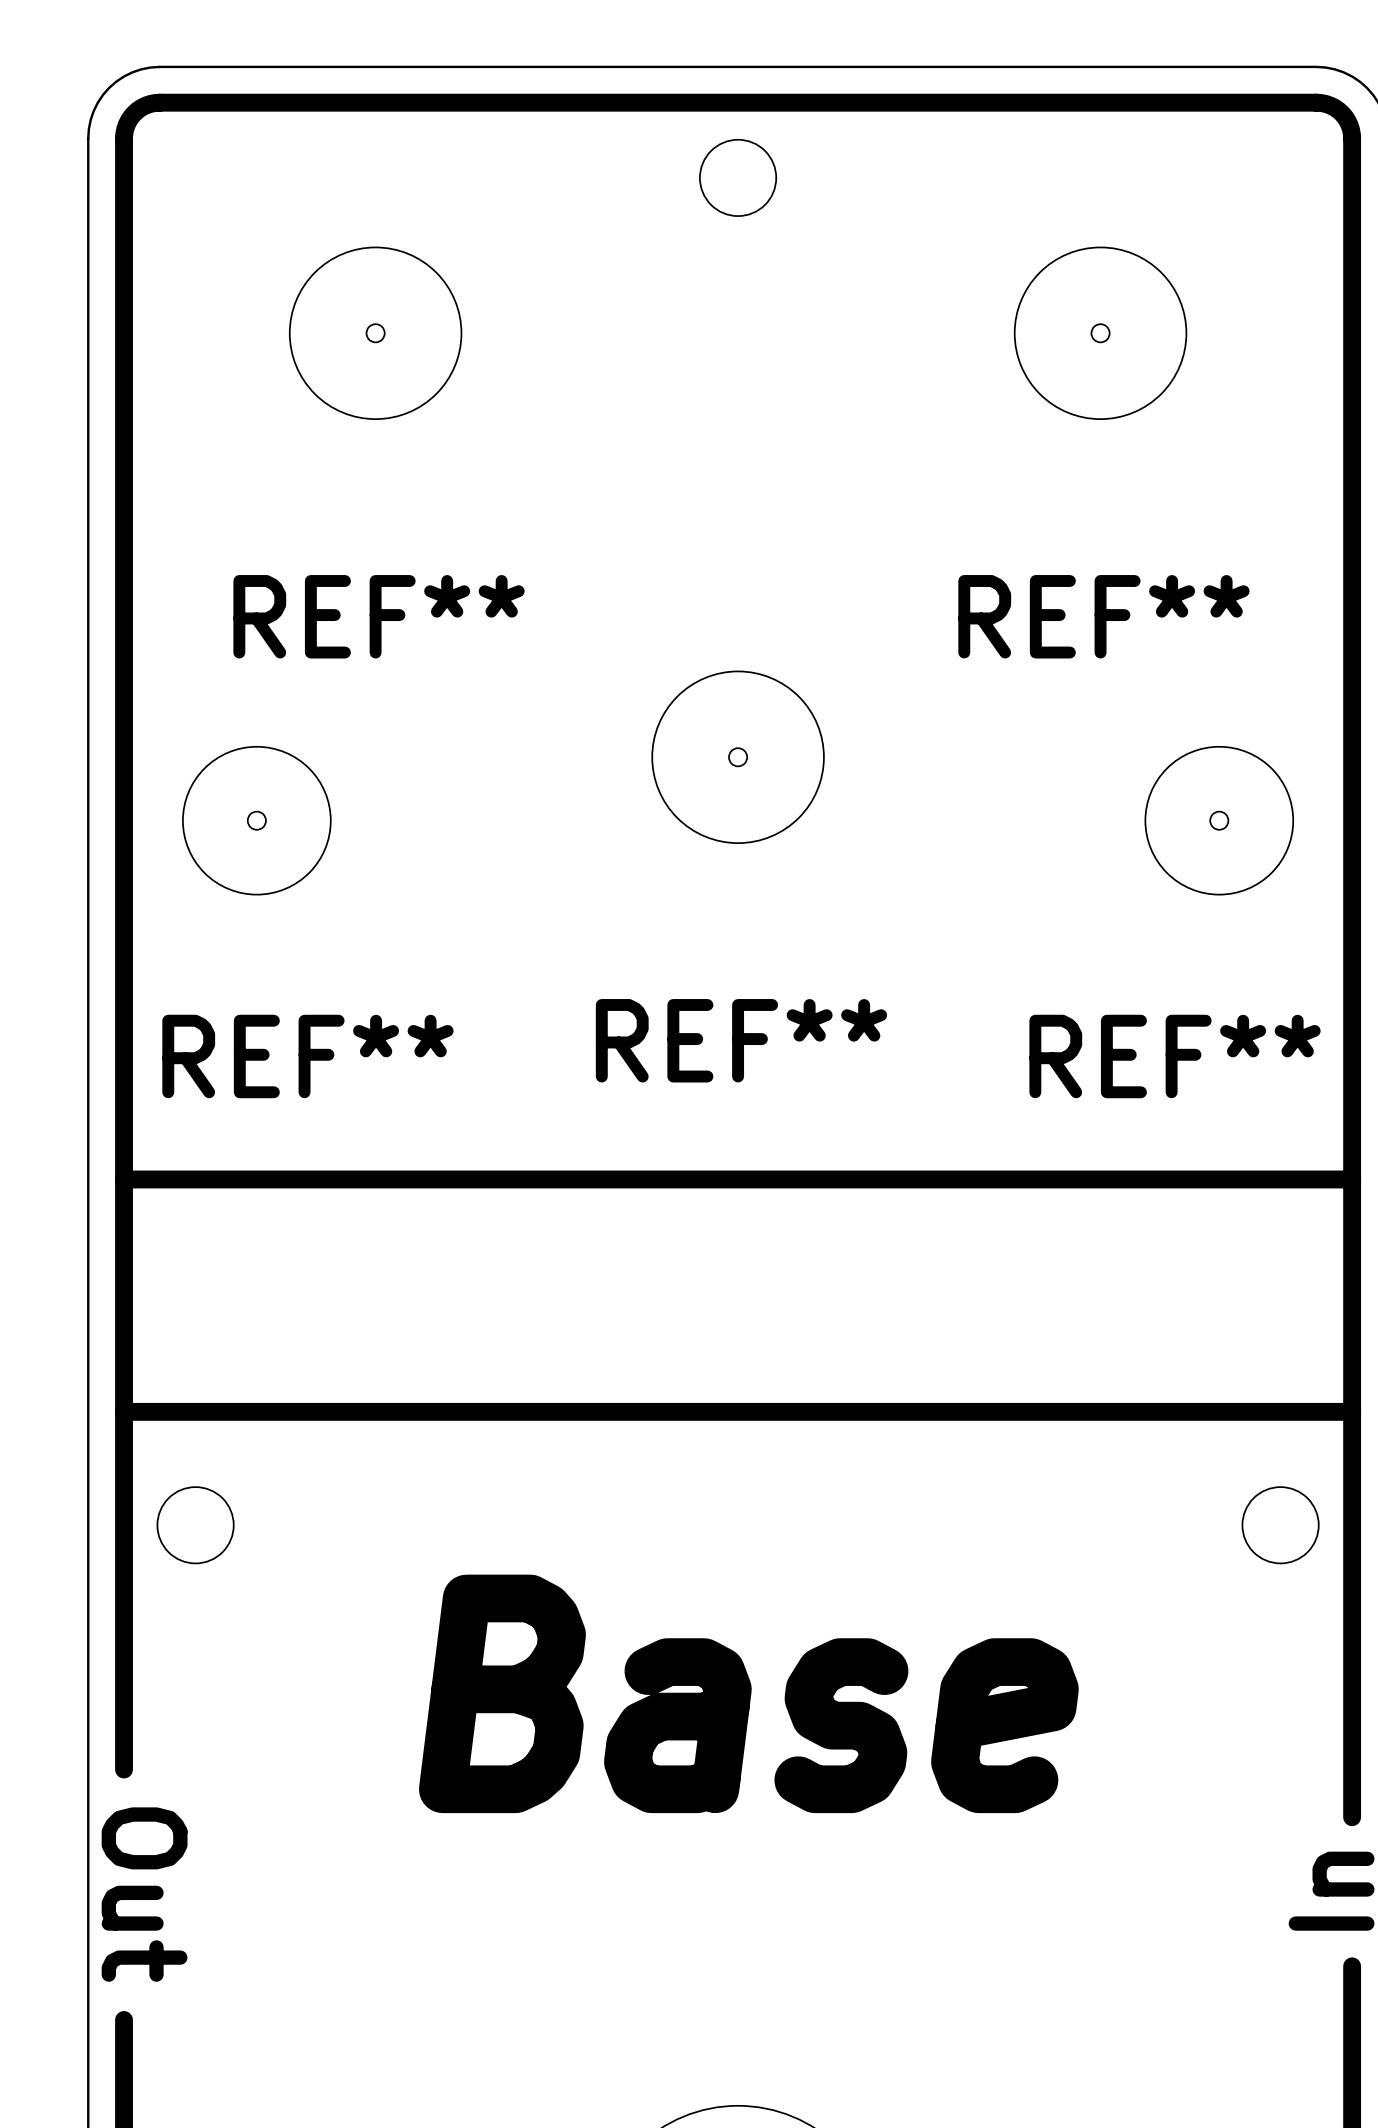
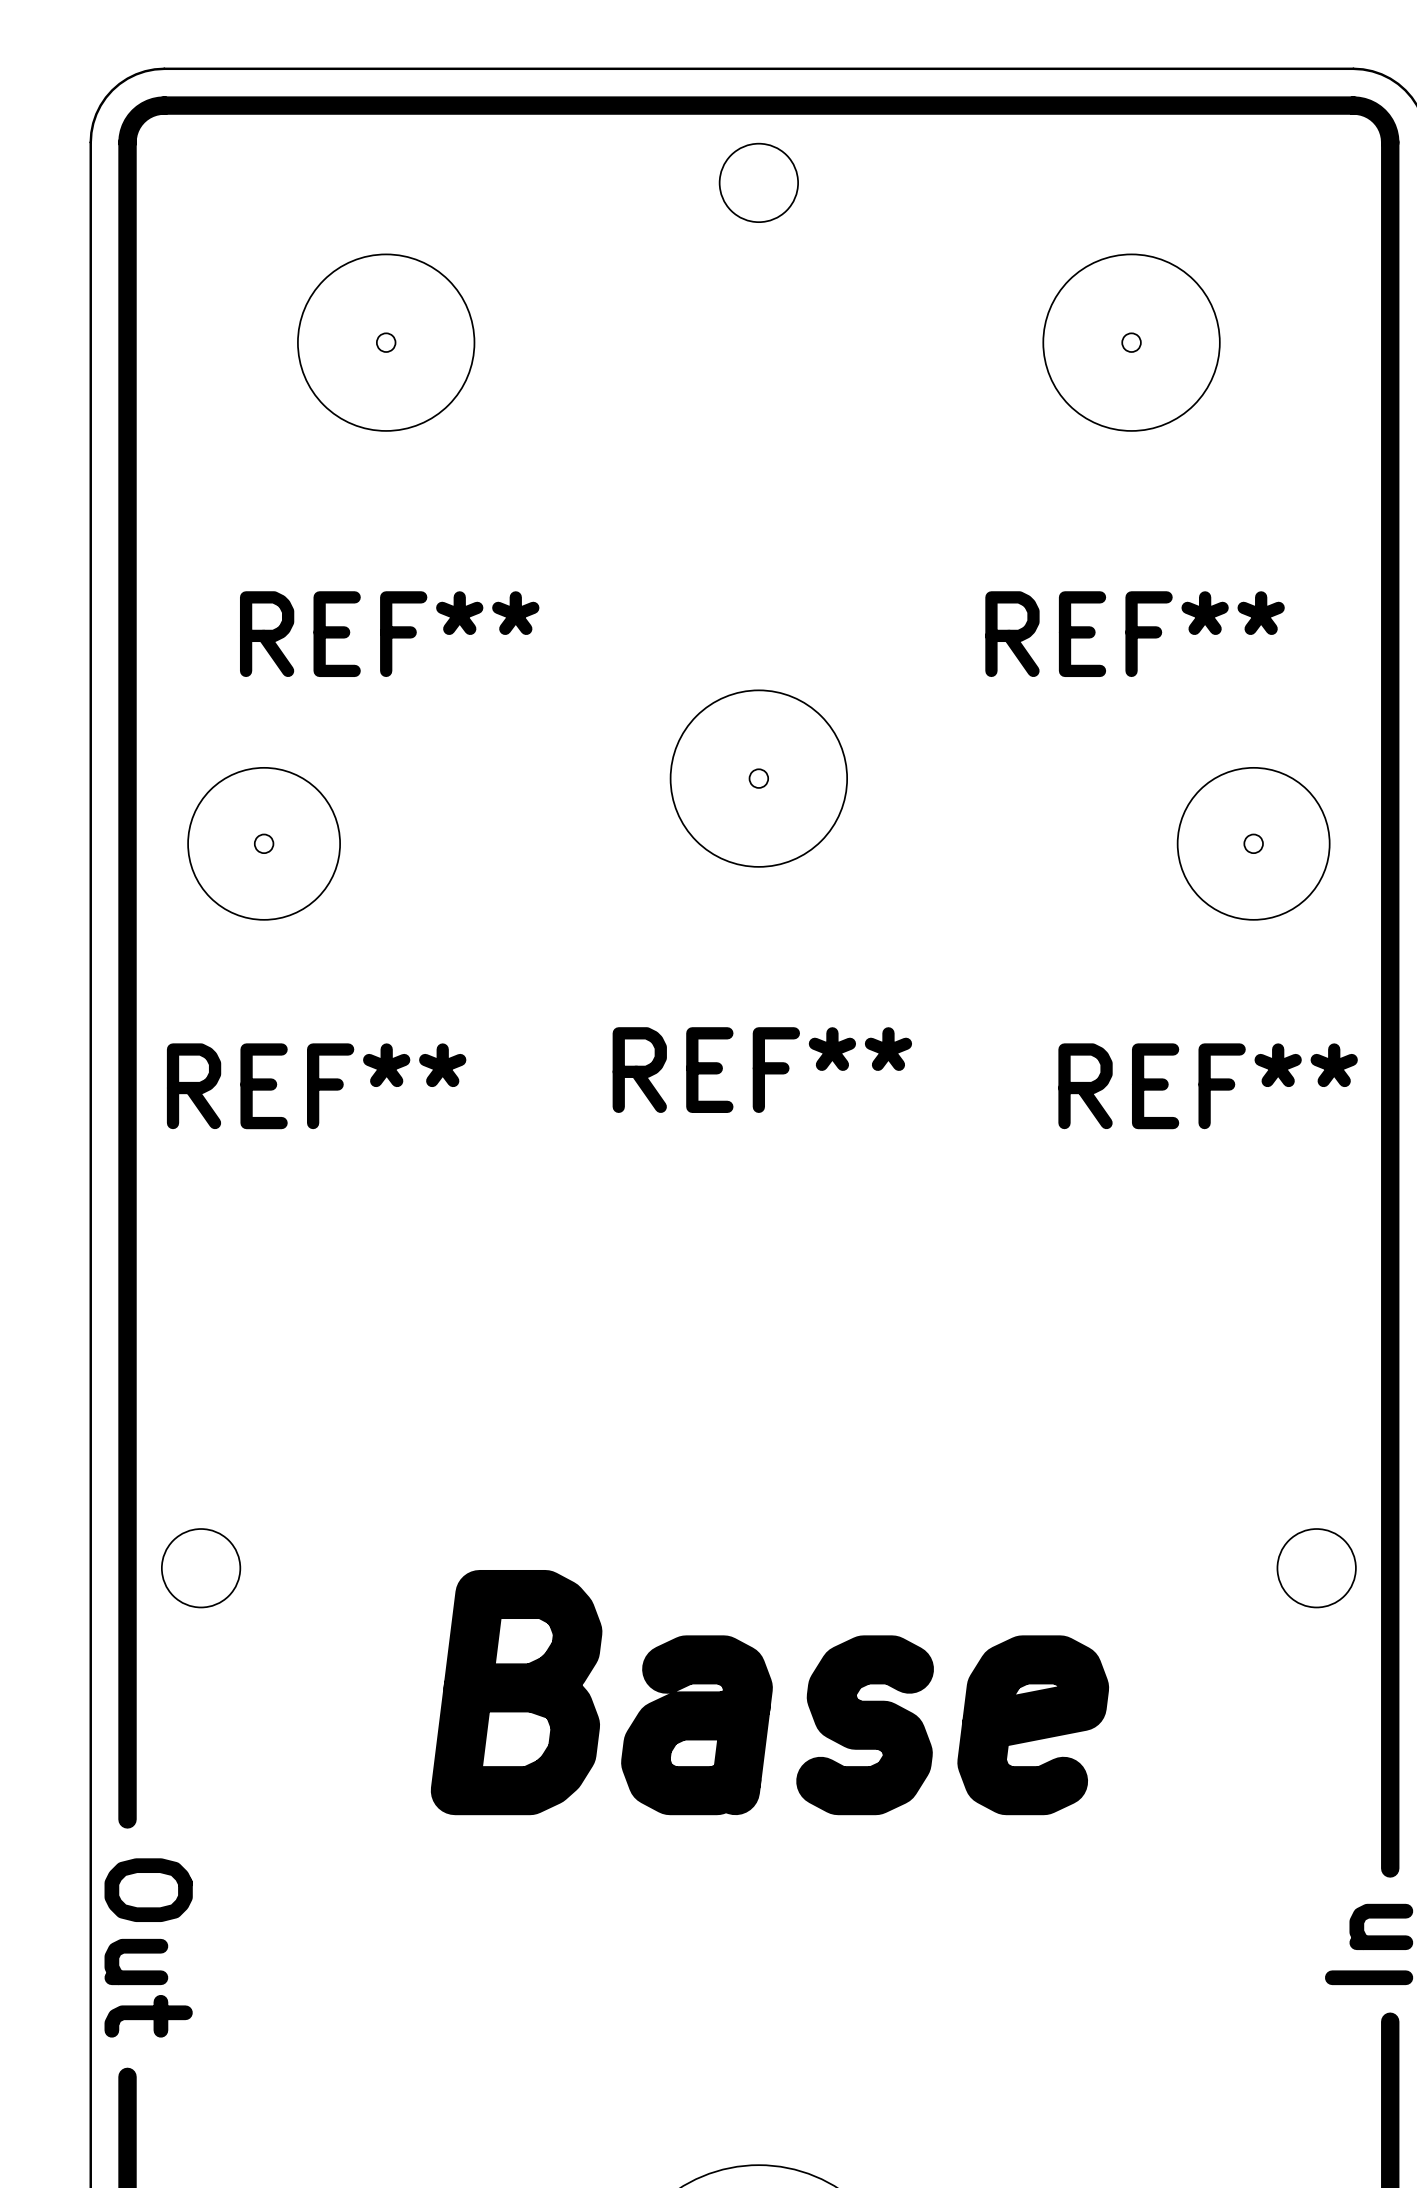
line: (124, 1179) (1352, 1179) -> none
line: (124, 1411) (1352, 1411) -> none
text position: Base (748, 1693) -> Base (769, 1692)

